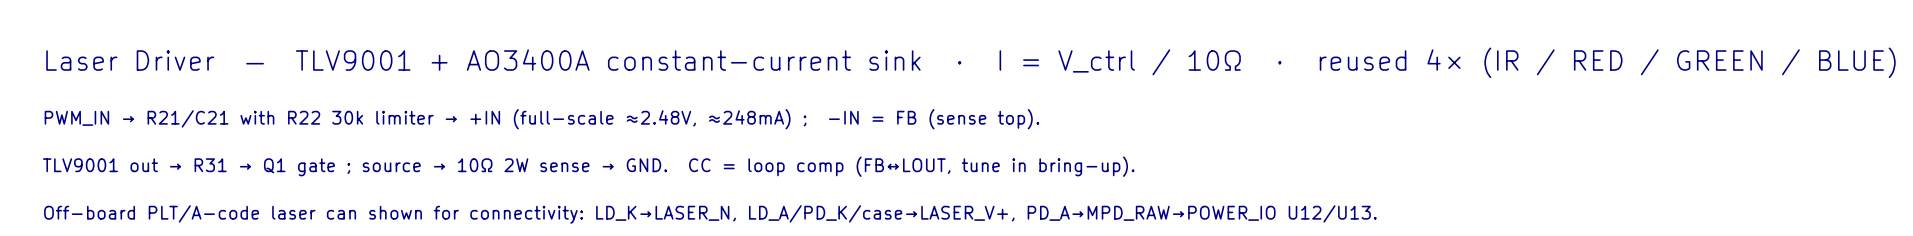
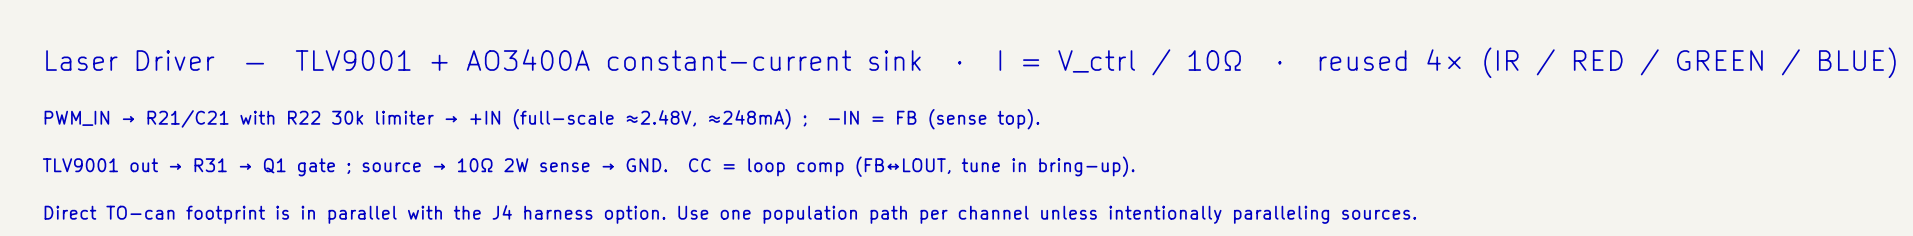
text: Off-board PLT/A-code laser can shown for connectivity: LD_K→LASER_N, LD_A/PD_K/case→LASER_V+, PD_A→MPD_RAW→POWER_IO U12/U13. (710, 214) -> Direct TO-can footprint is in parallel with the J4 harness option. Use one population path per channel unless intentionally paralleling sources. (730, 214)

